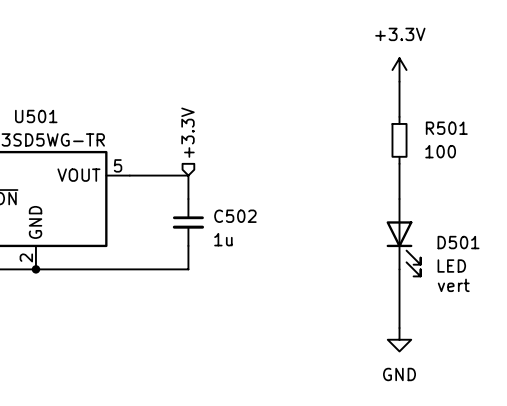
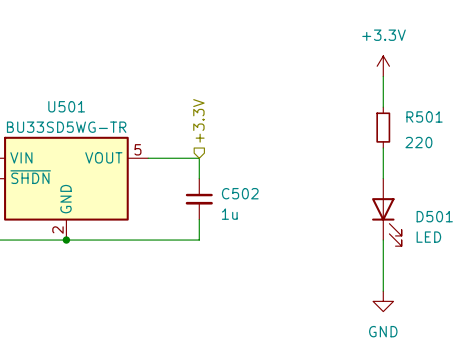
R501 value: 100 (440, 151) -> 220 (418, 142)
D501 text: vert (453, 285) -> none

